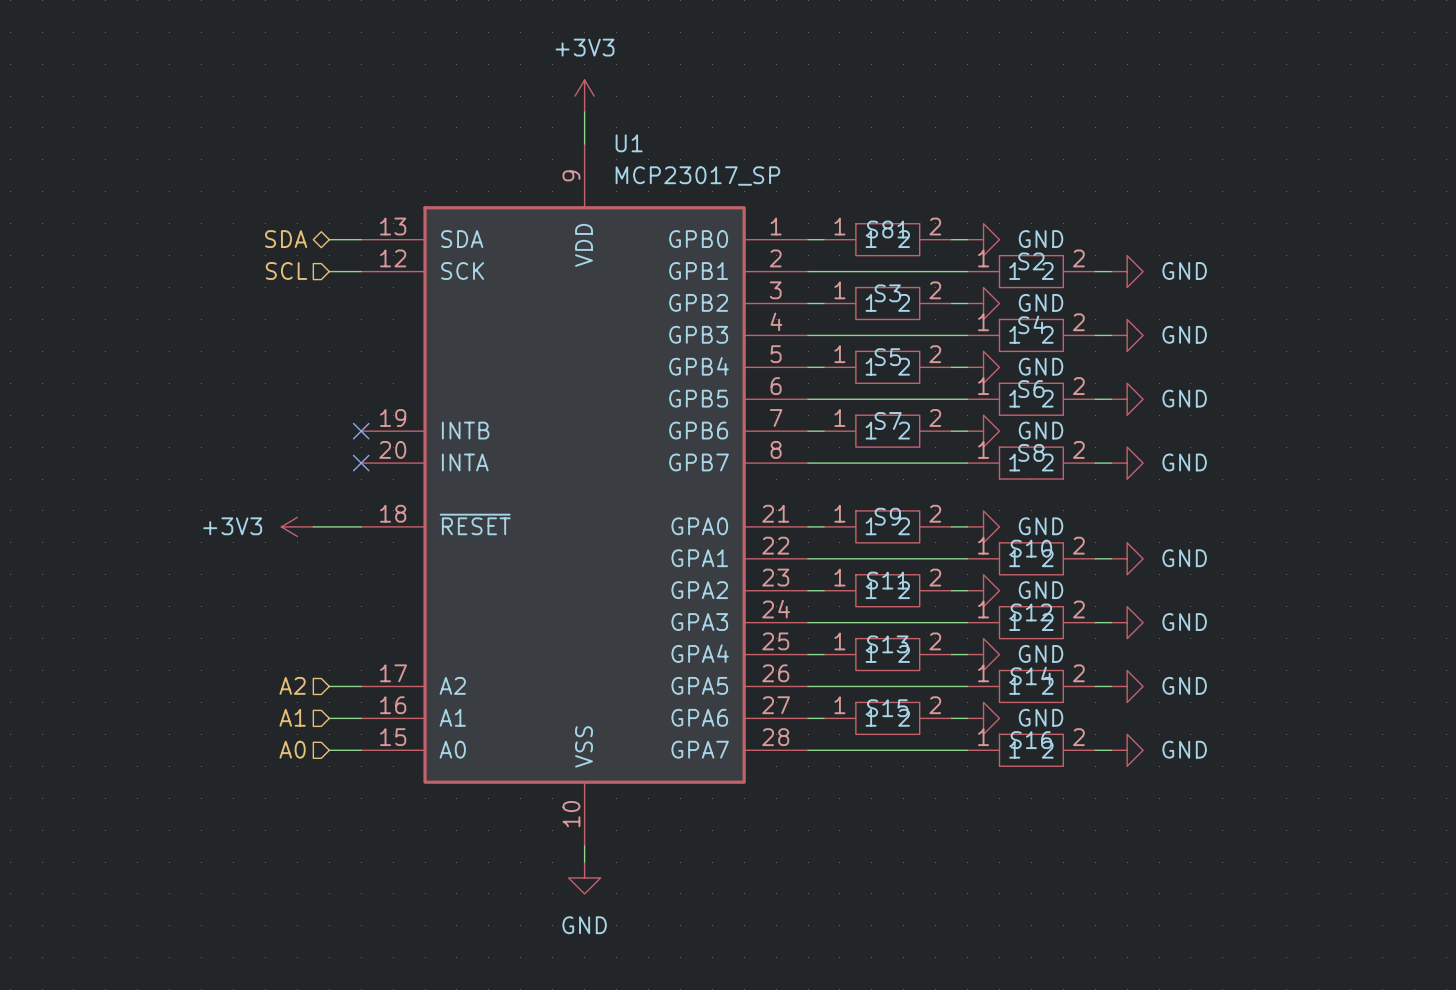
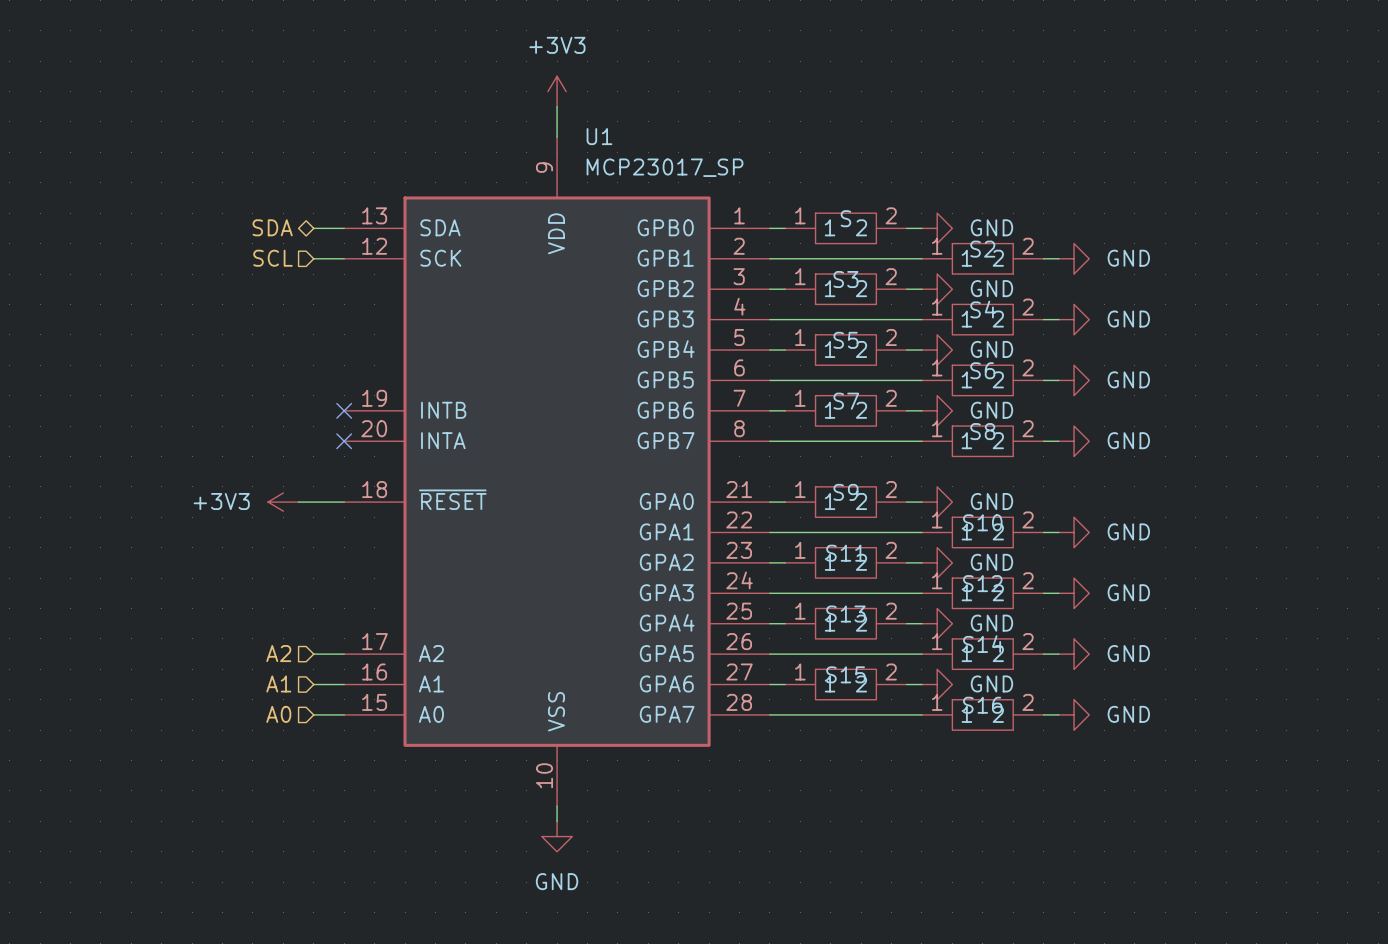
S81 name: S81 (887, 229) -> S (845, 218)

